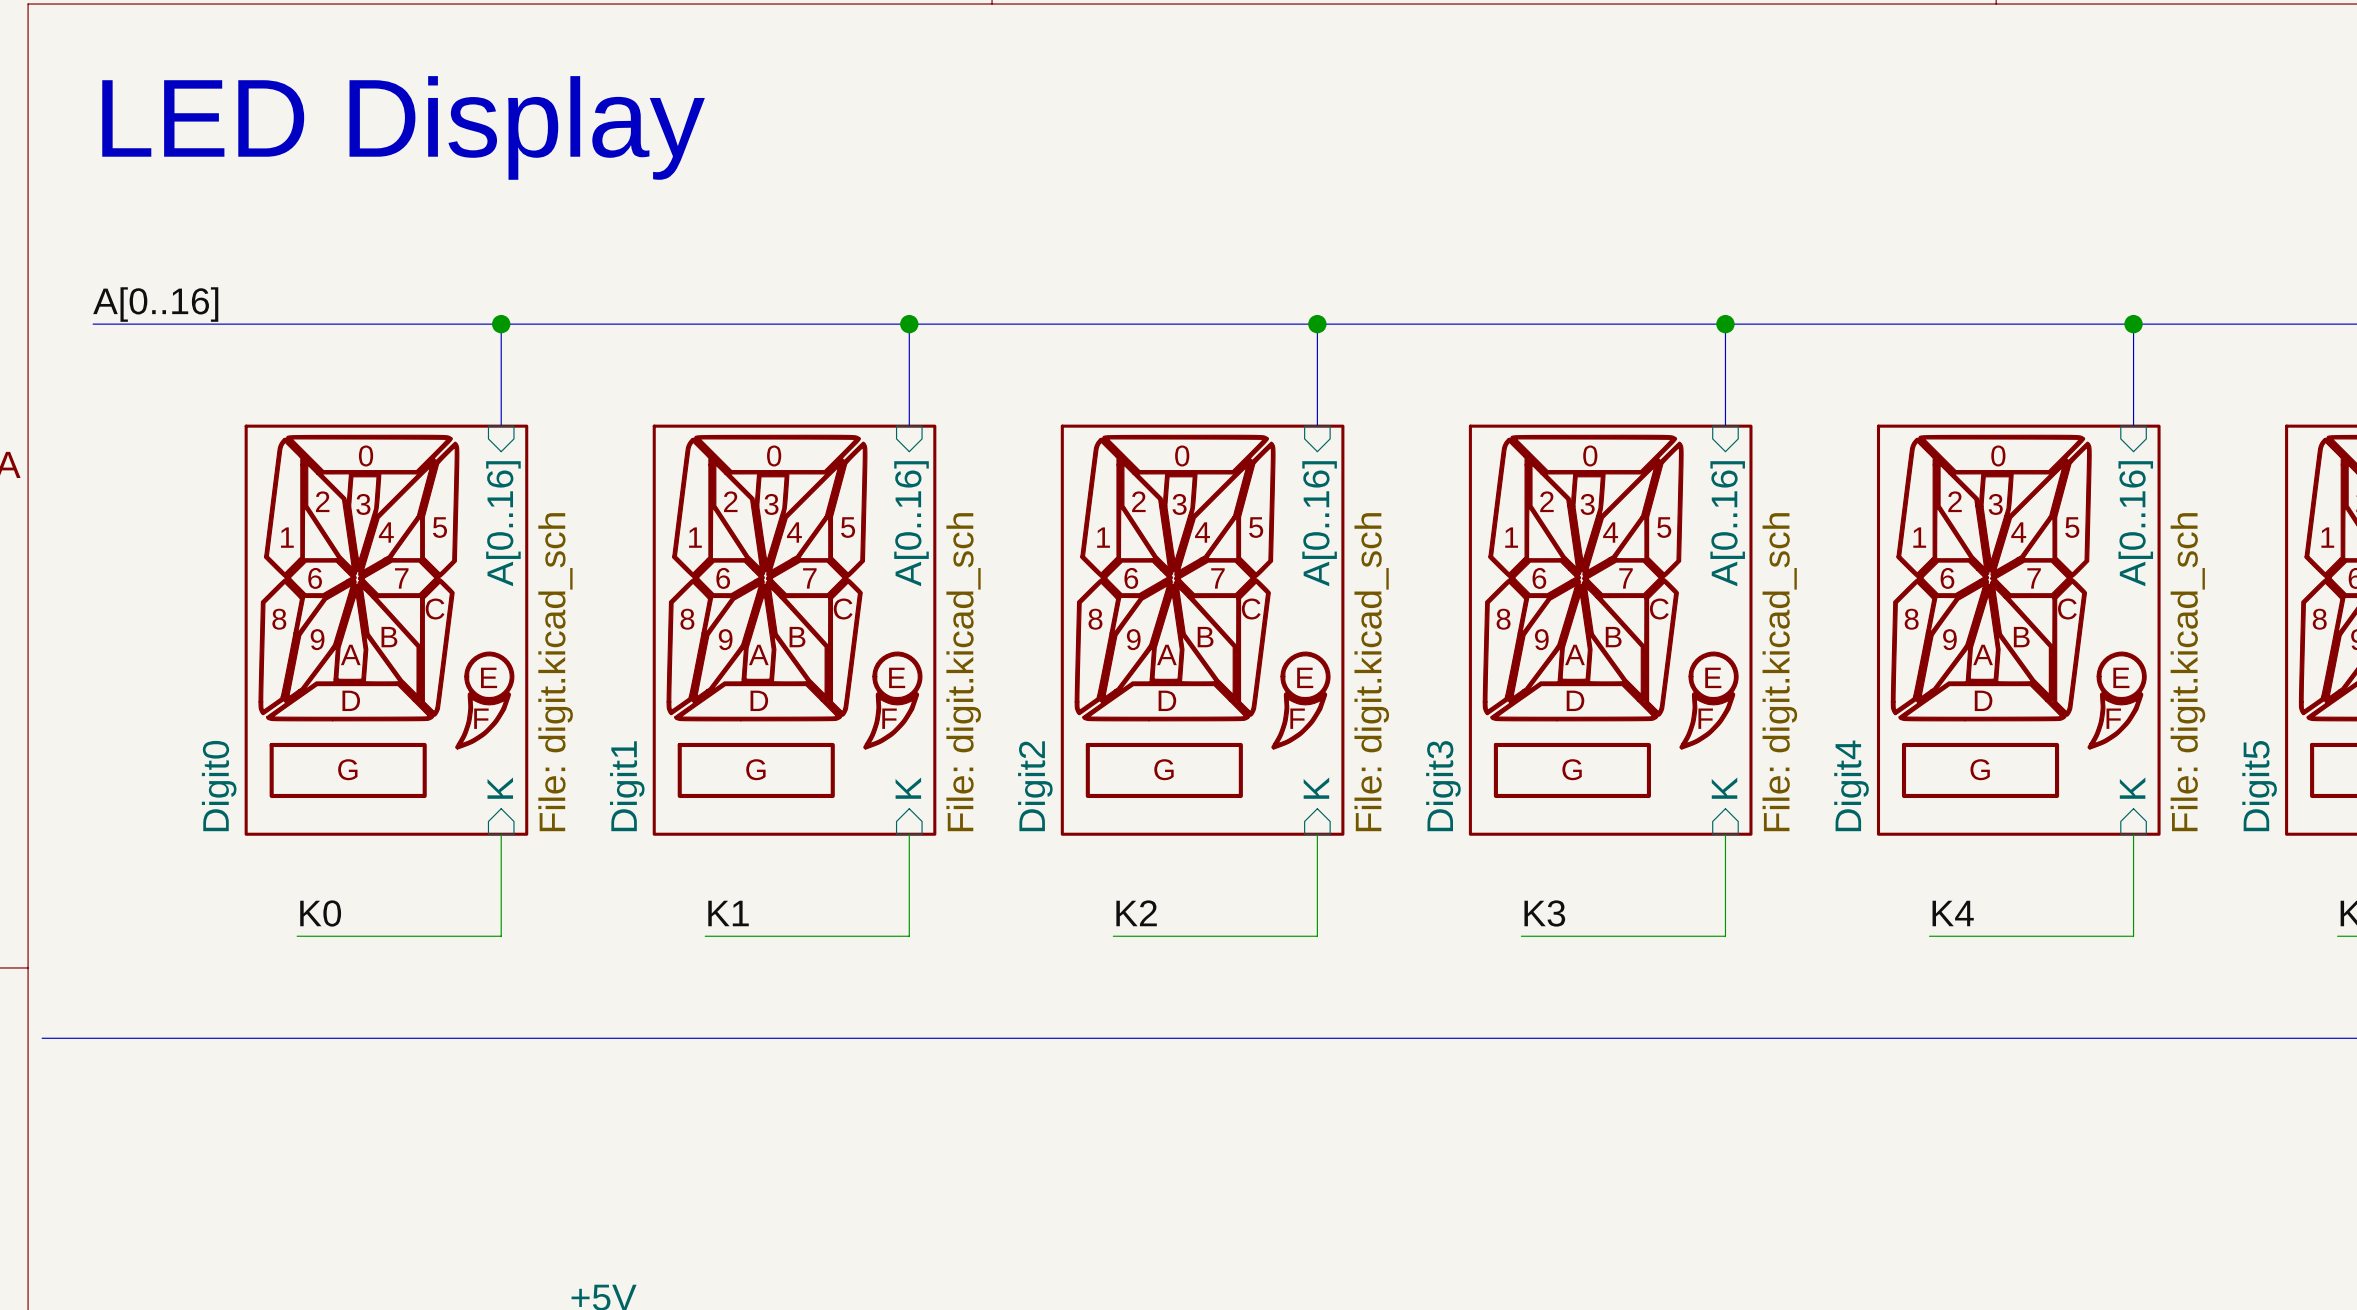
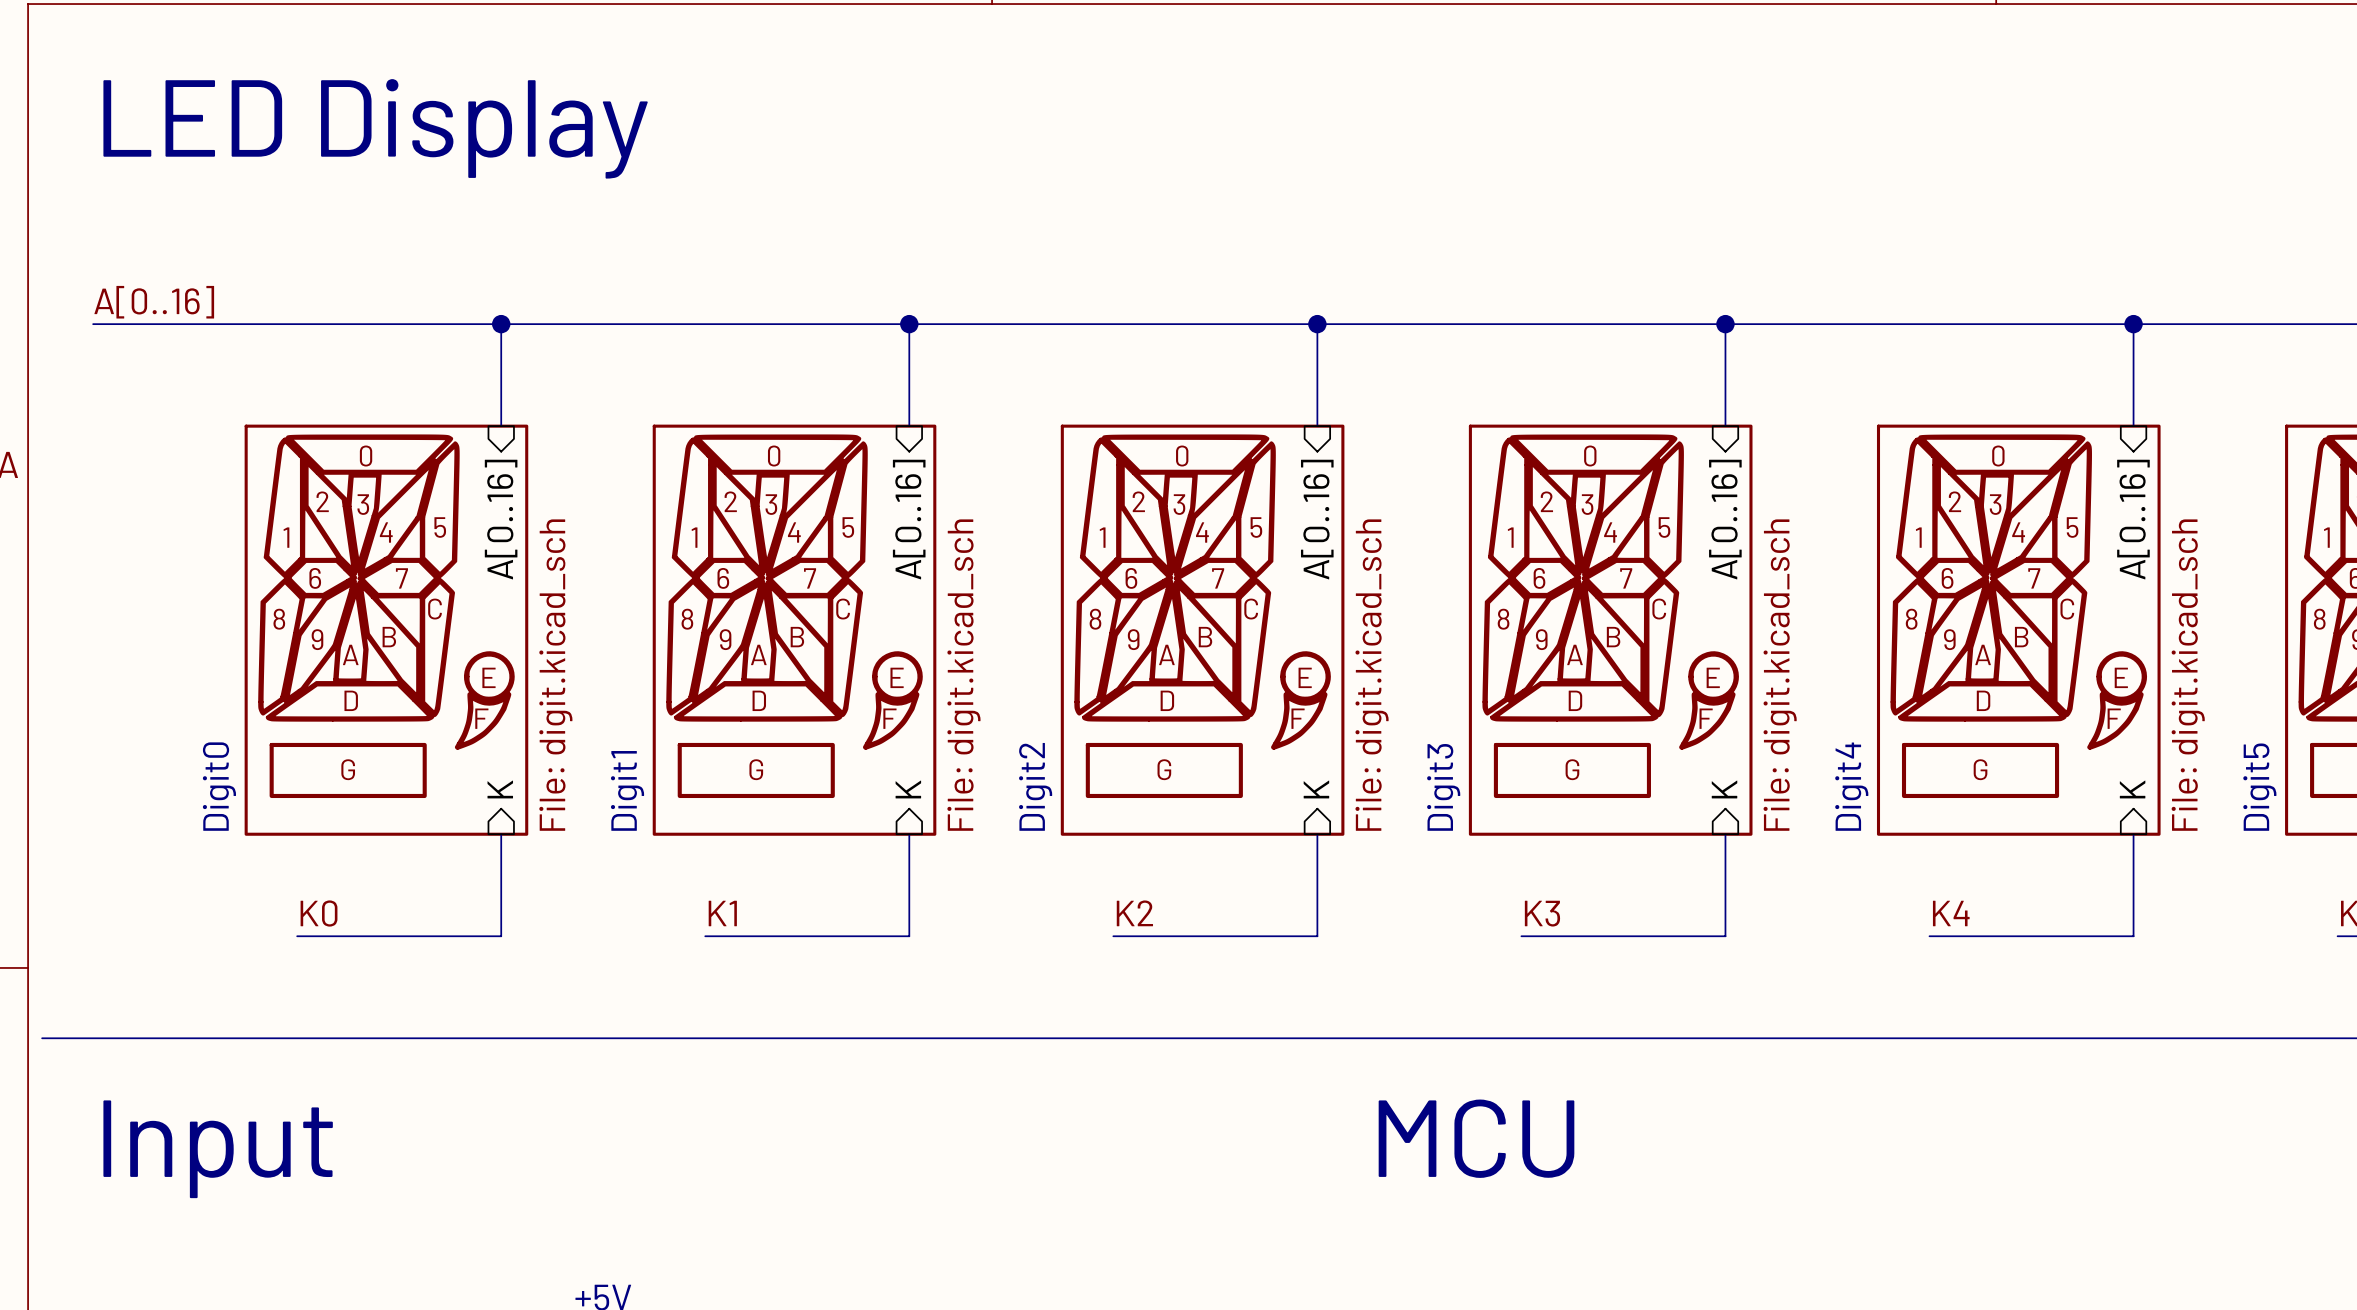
text: none -> MCU (1476, 1138)
text: none -> Input (218, 1149)

